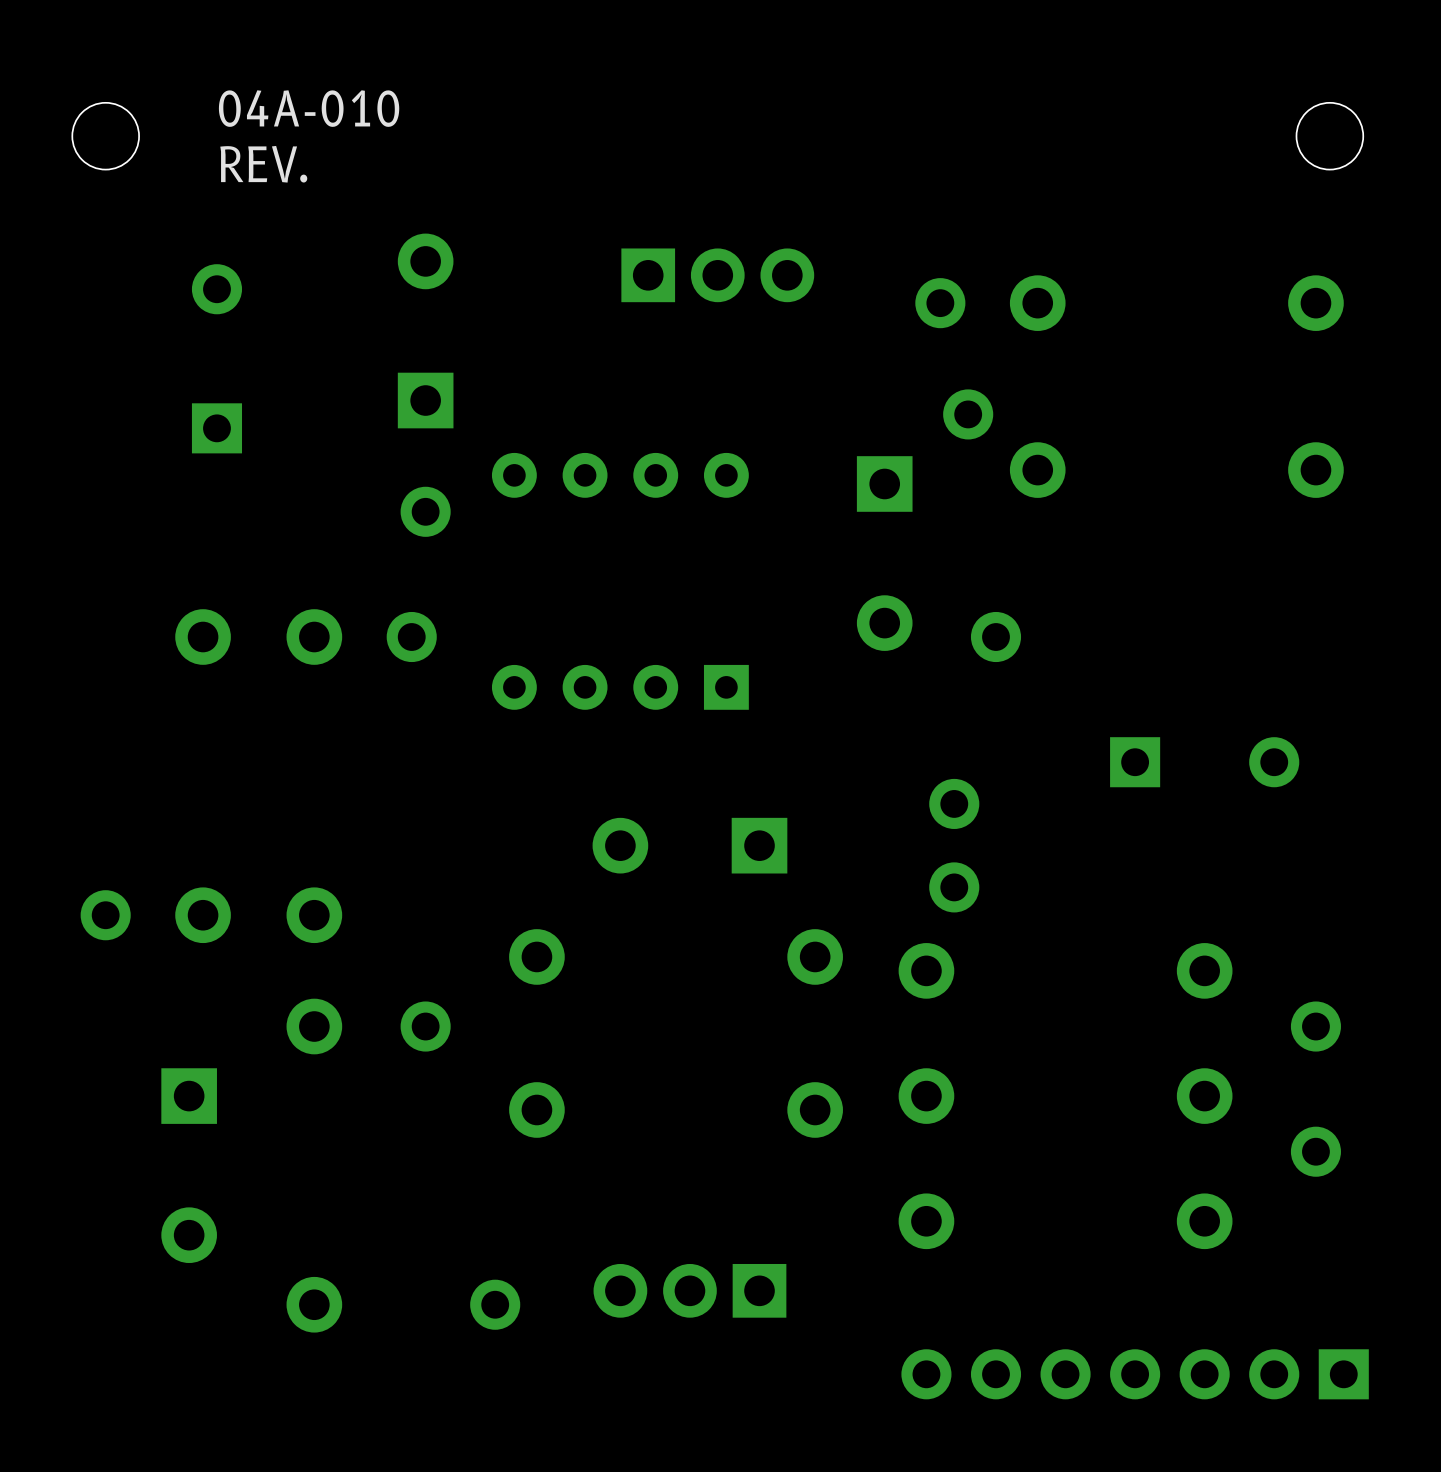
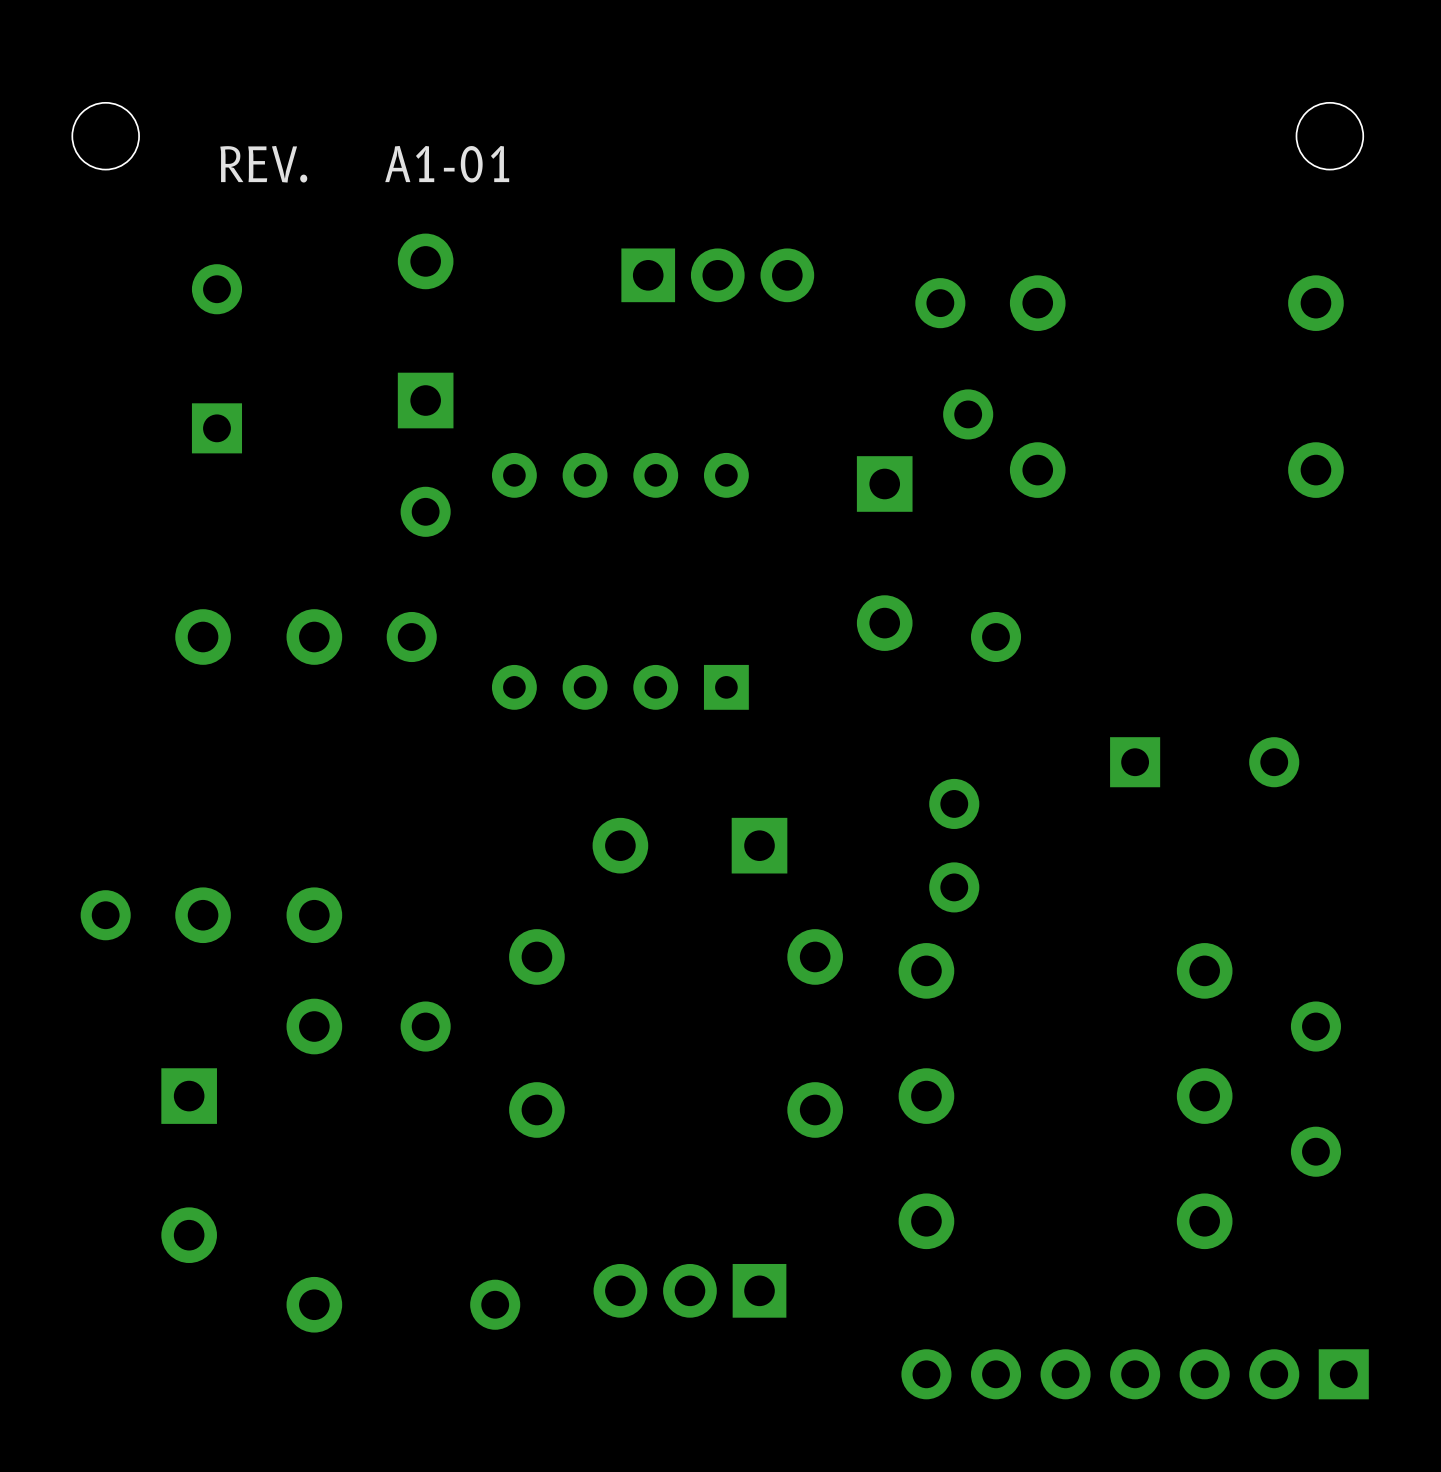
part text: 04A-010 (309, 108) -> none
part text: none -> A1-01 (447, 164)

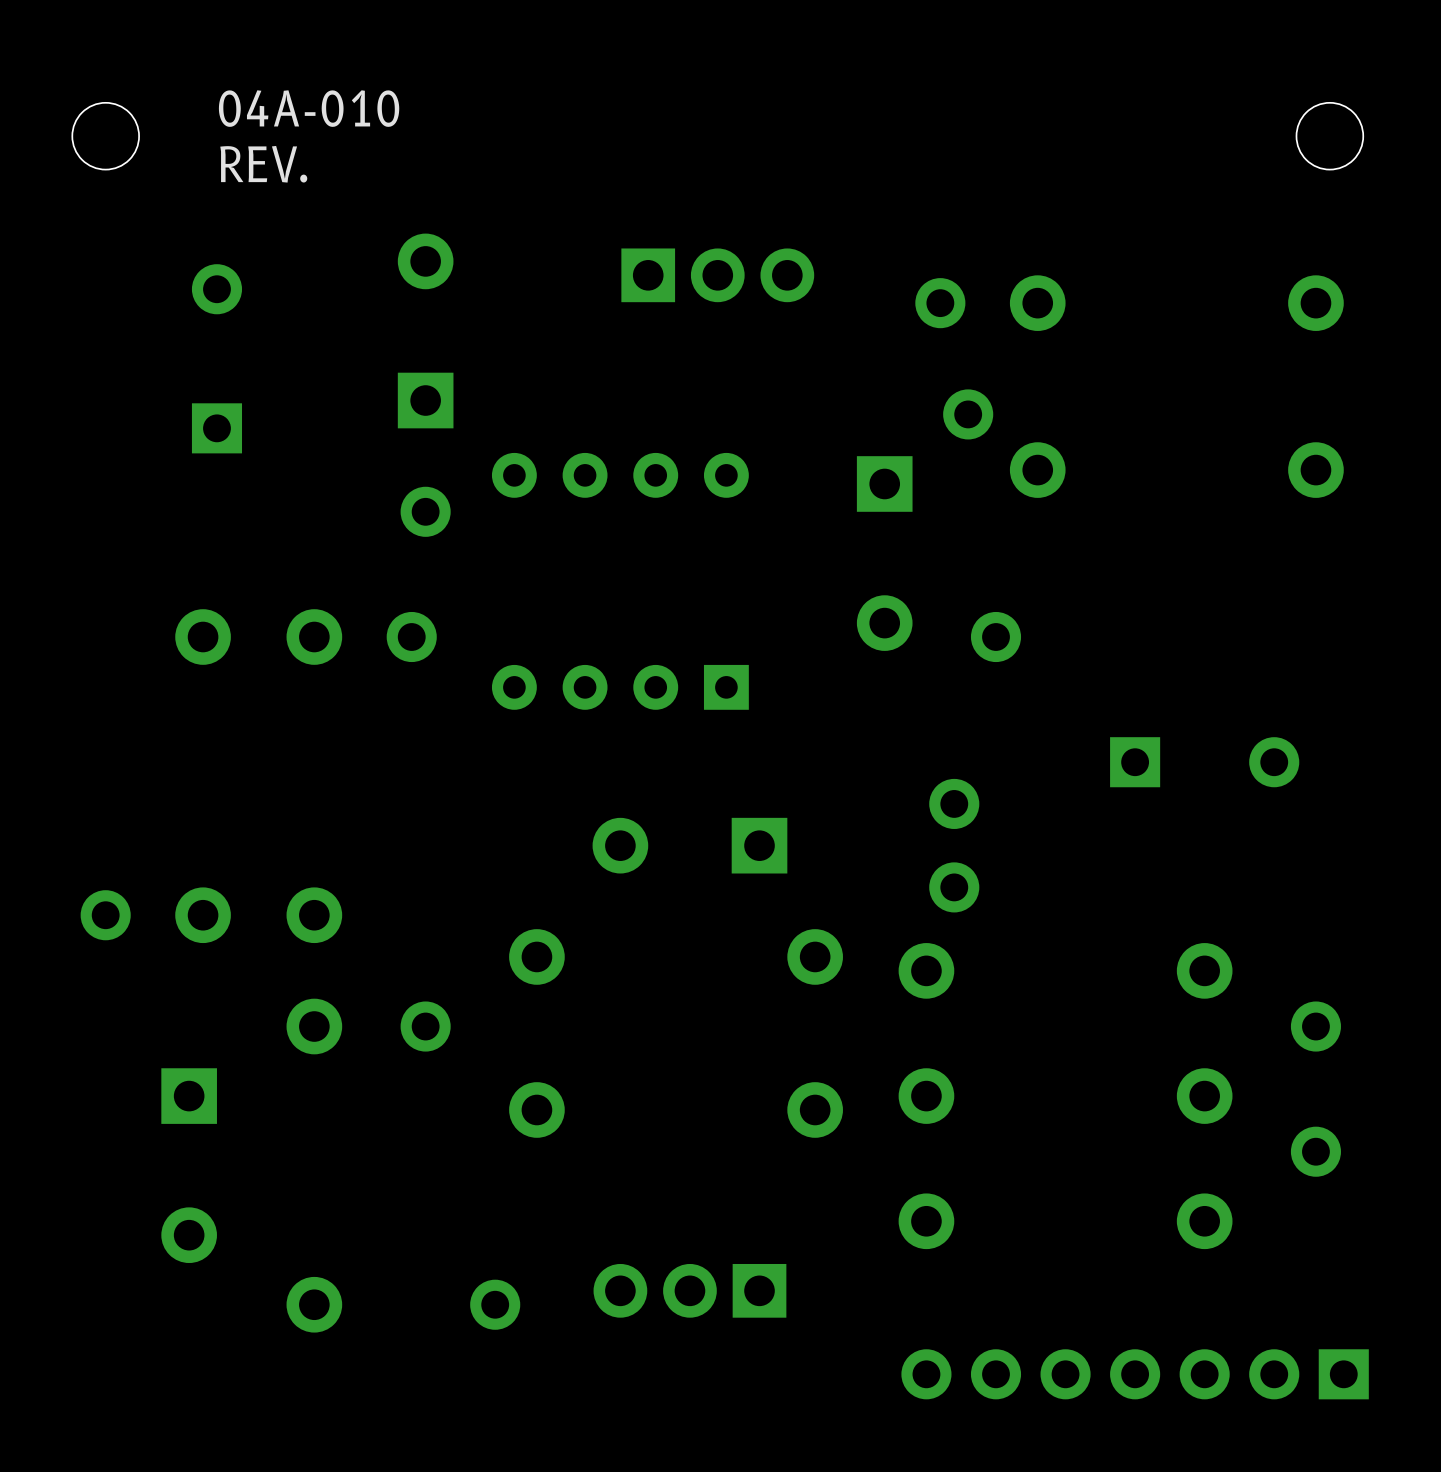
part text: none -> 04A-010 (309, 108)
part text: A1-01 (447, 164) -> none

